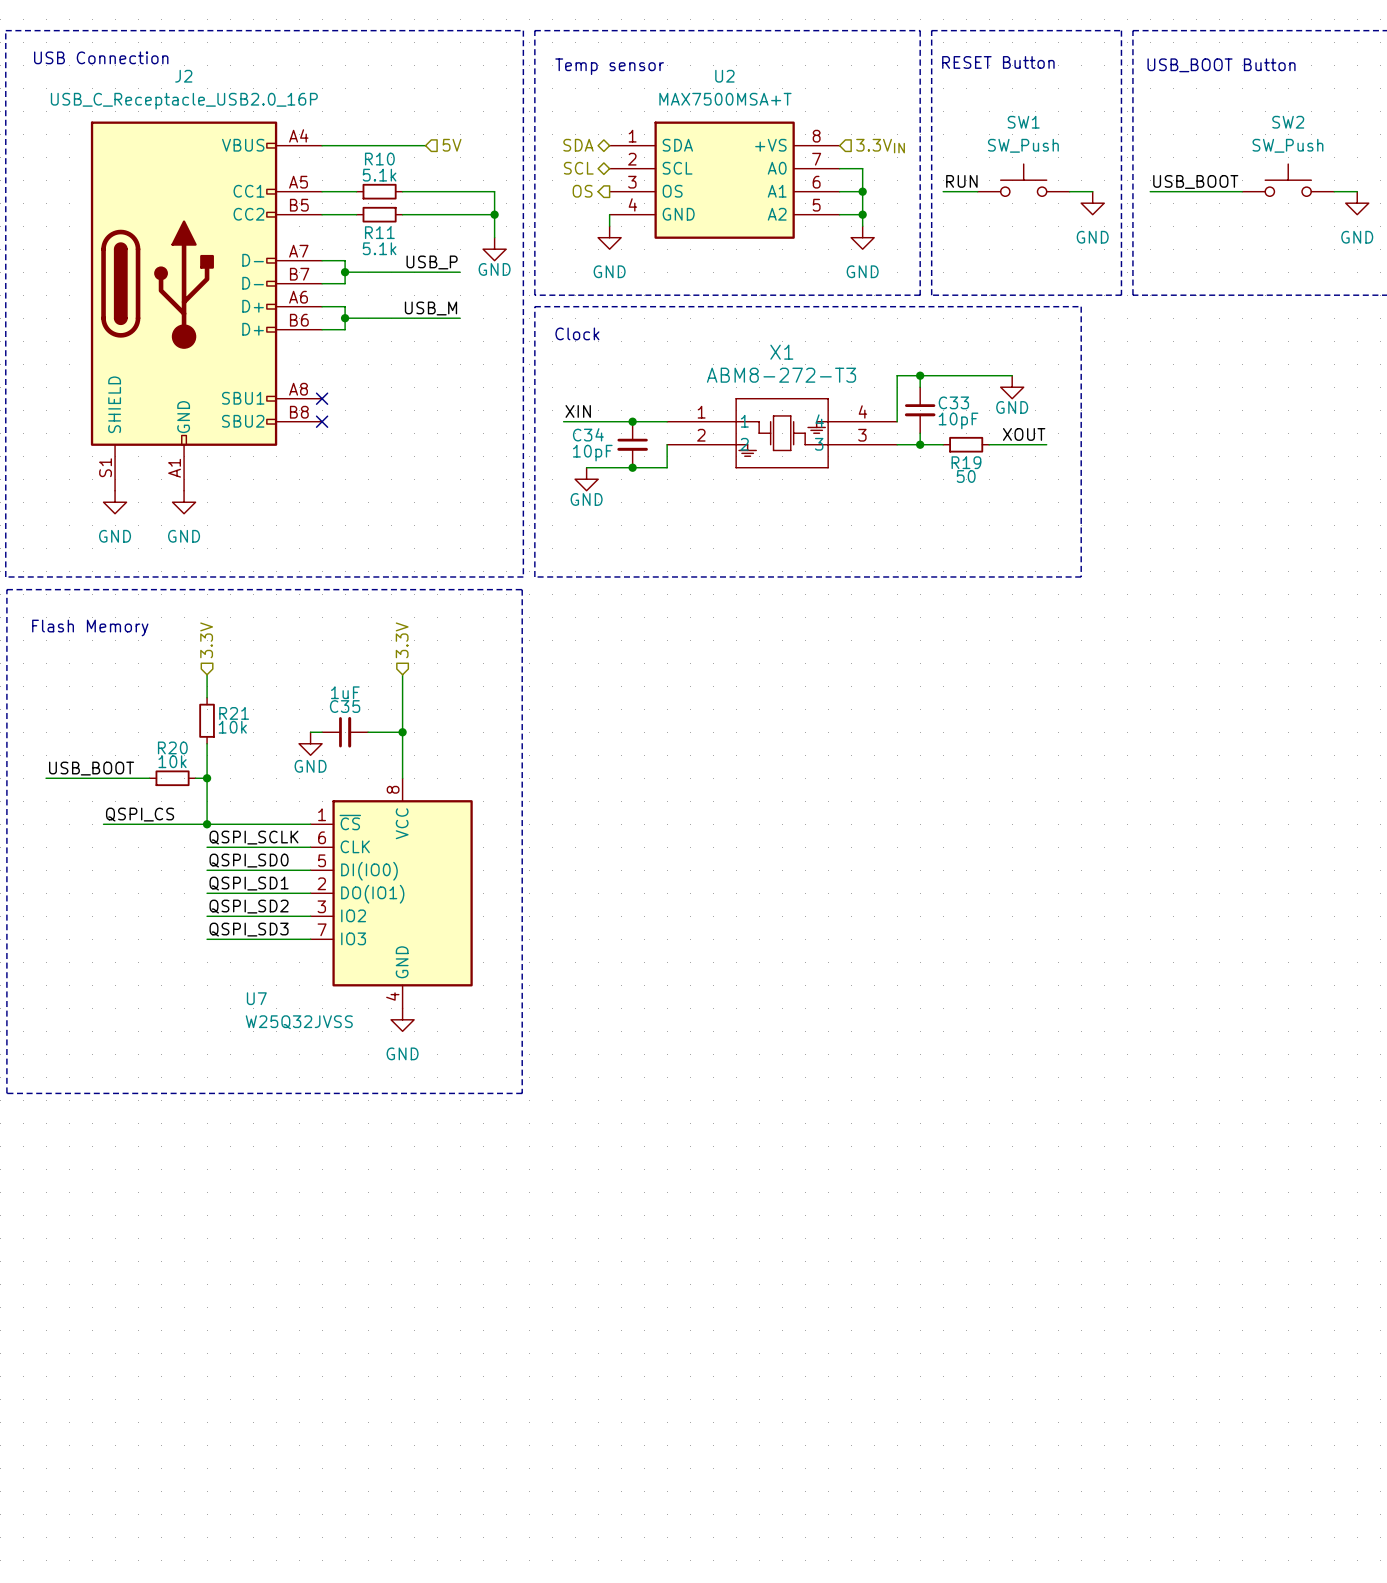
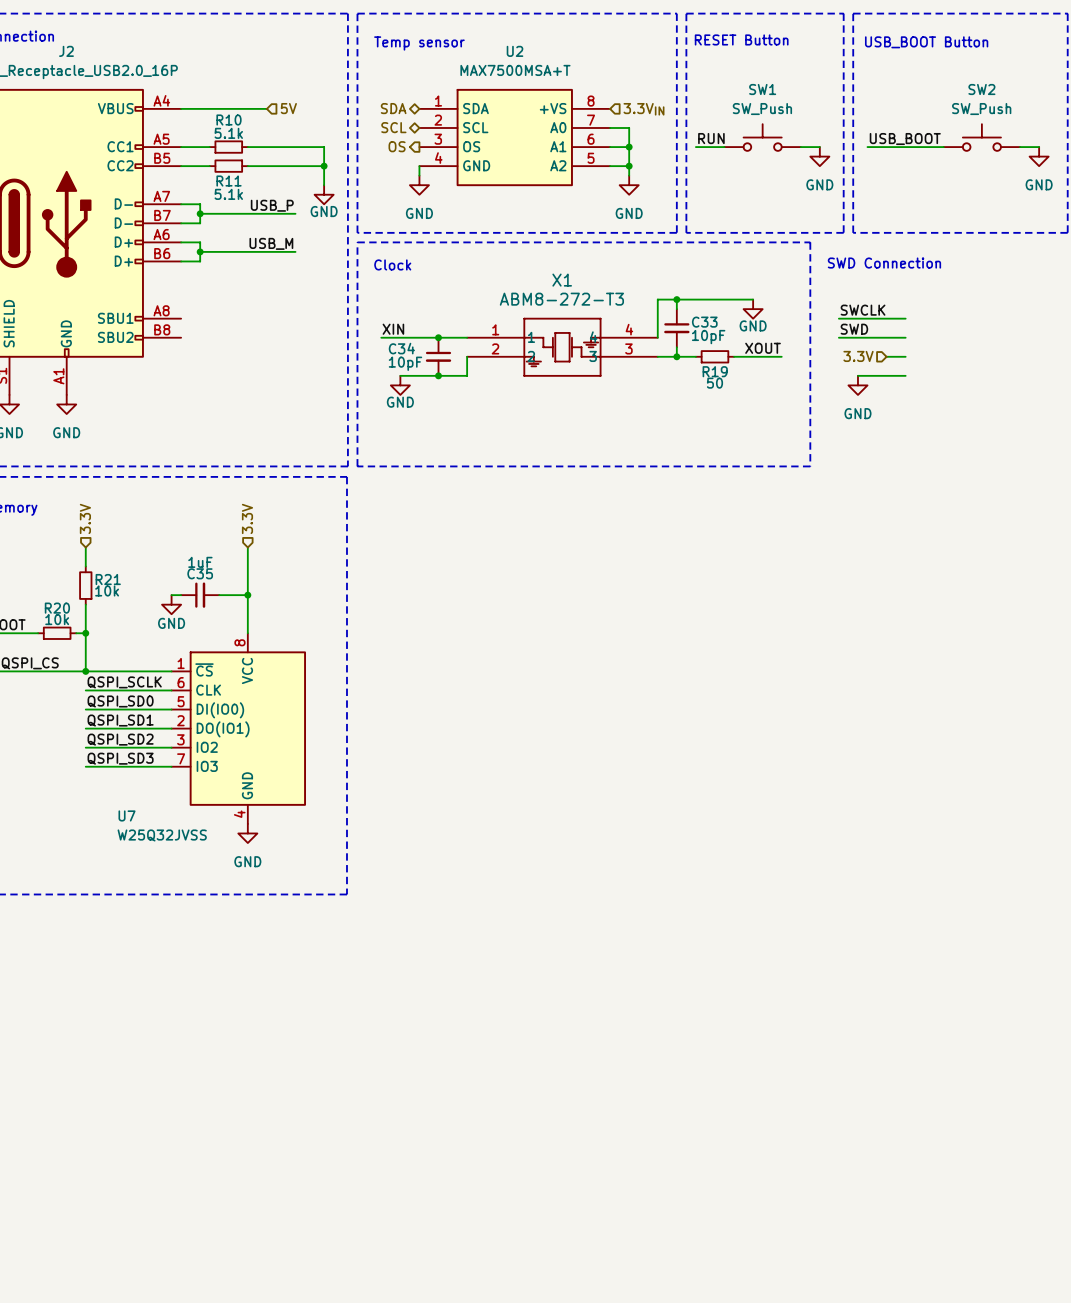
text: none -> SWD Connection (884, 263)
label: none -> SWCLK (863, 310)
no-connect mark: (322, 398) -> none
wire: none -> (838, 318) (905, 318)
label: none -> SWD (854, 329)
no-connect mark: (322, 421) -> none
wire: none -> (838, 337) (905, 337)
hierarchical label: none -> 3.3V (858, 356)
wire: none -> (886, 356) (905, 356)
wire: none -> (857, 375) (905, 375)
power symbol: none -> GND (857, 385)

